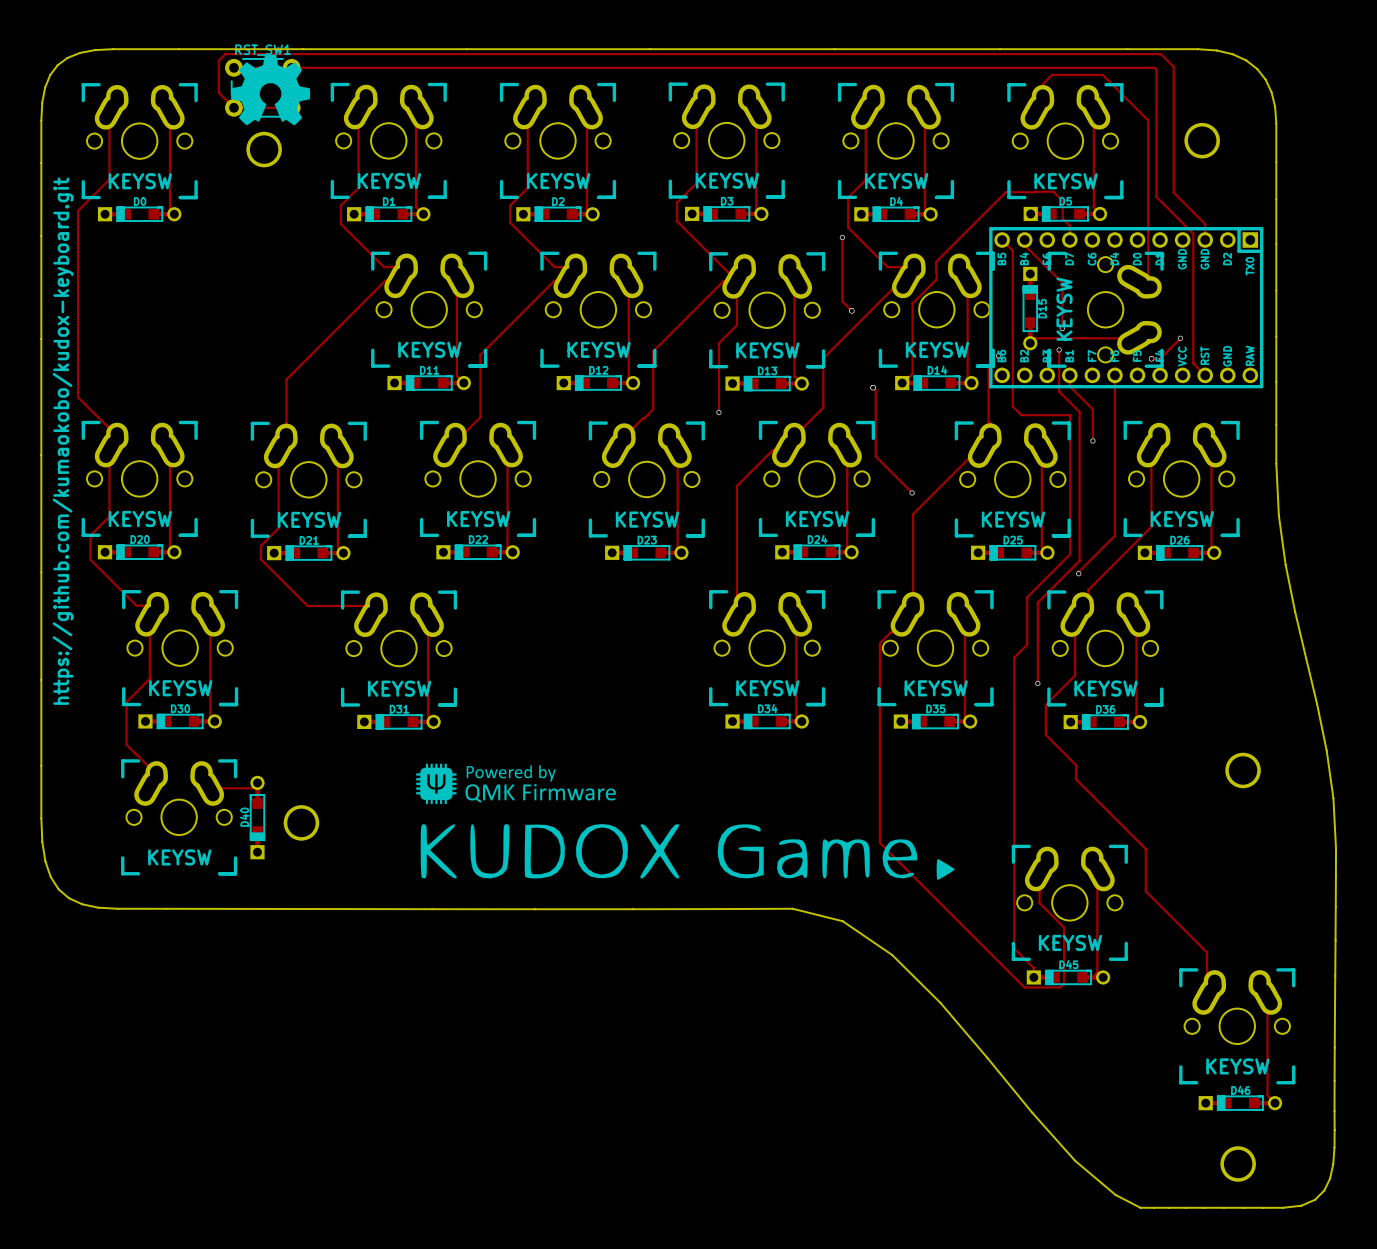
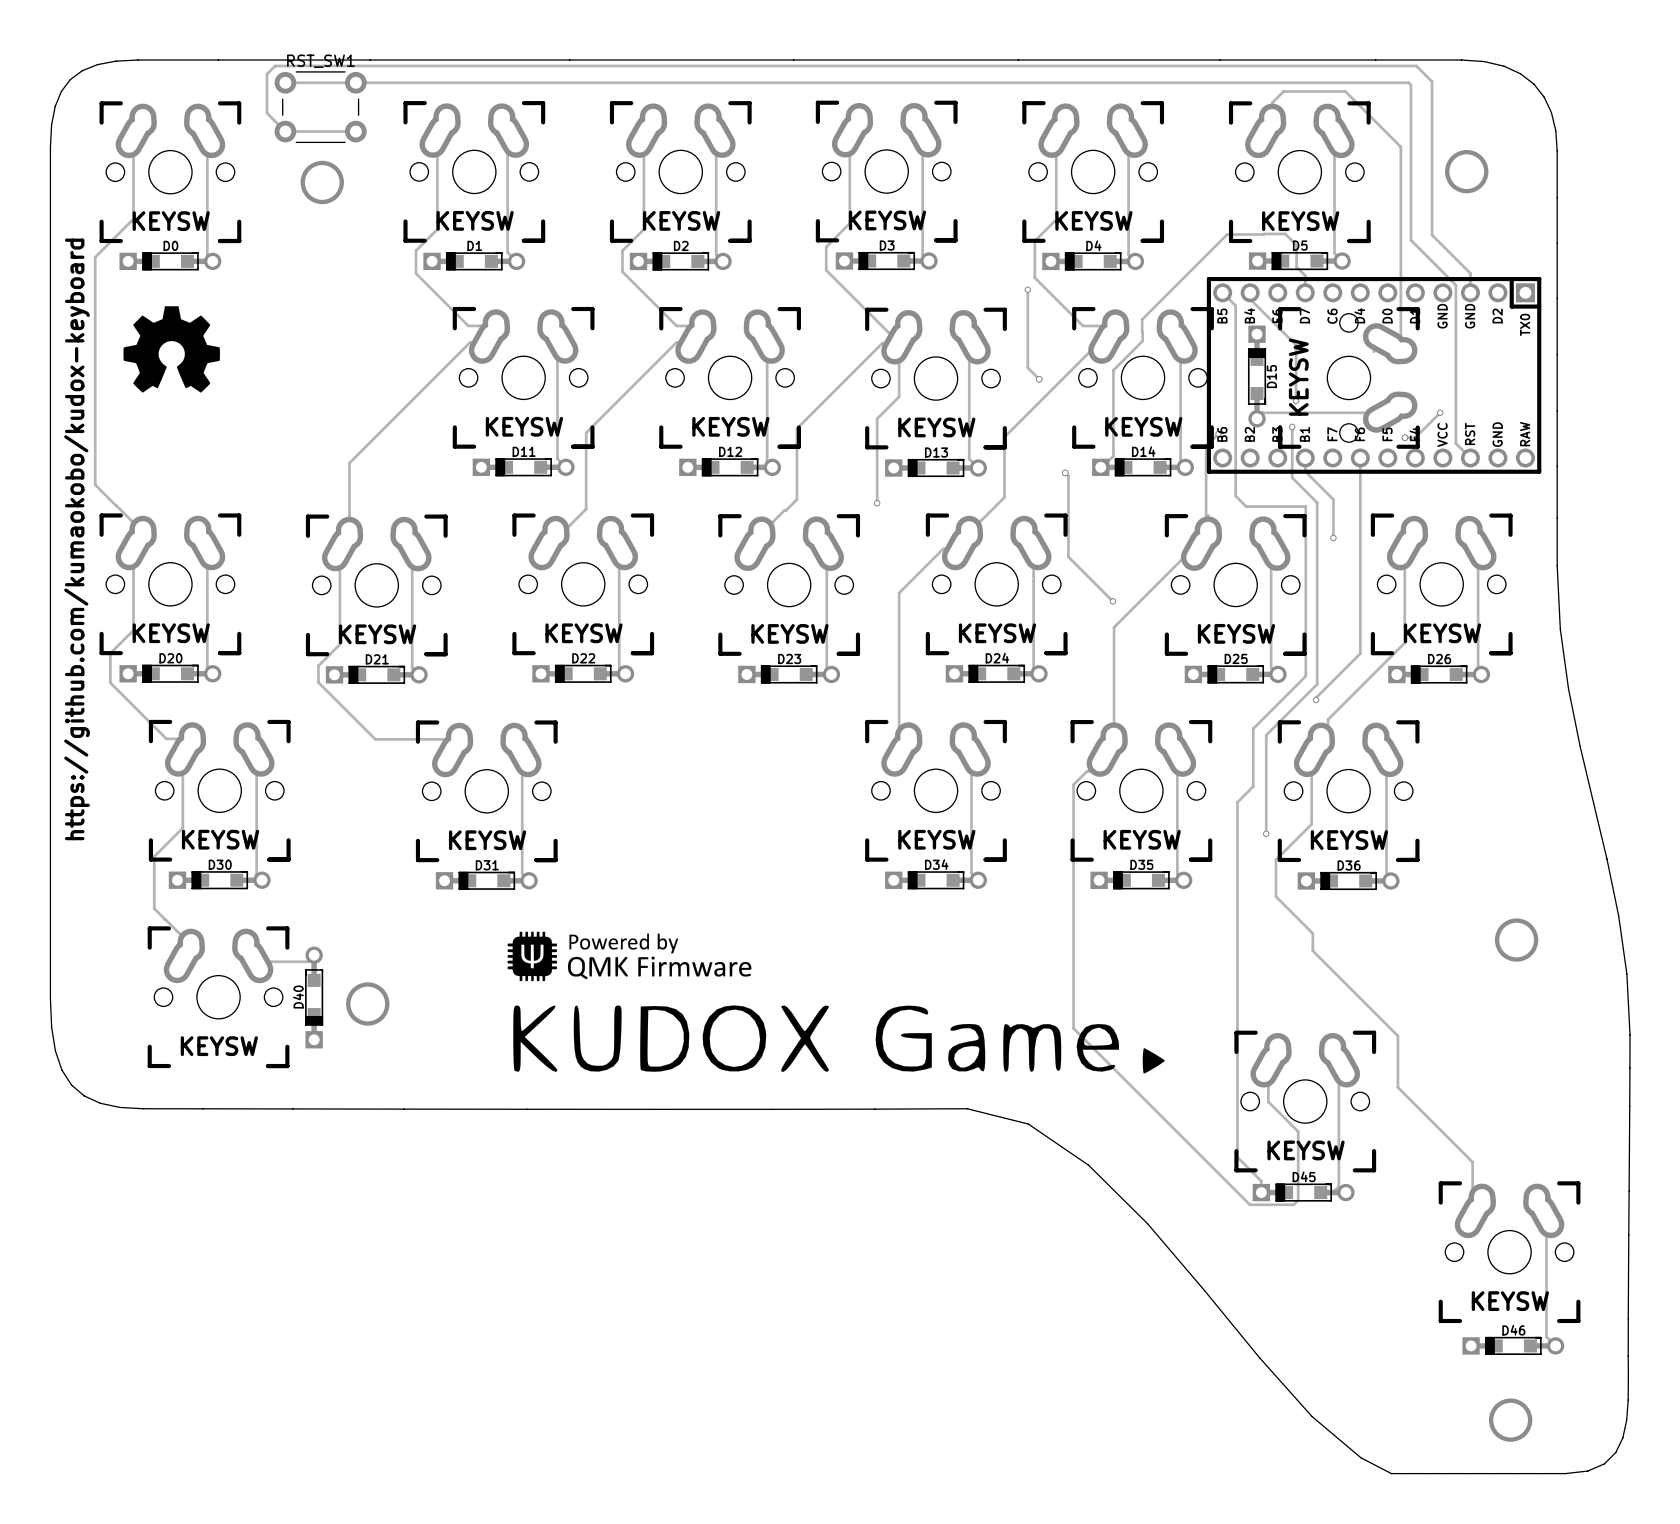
drawing: [231, 54, 311, 126] -> none
drawing: none -> [123, 306, 221, 393]
text: https://github.com/kumaokobo/kudox-keyboard.git (63, 441) -> https://github.com/kumaokobo/kudox-keyboard (77, 539)

